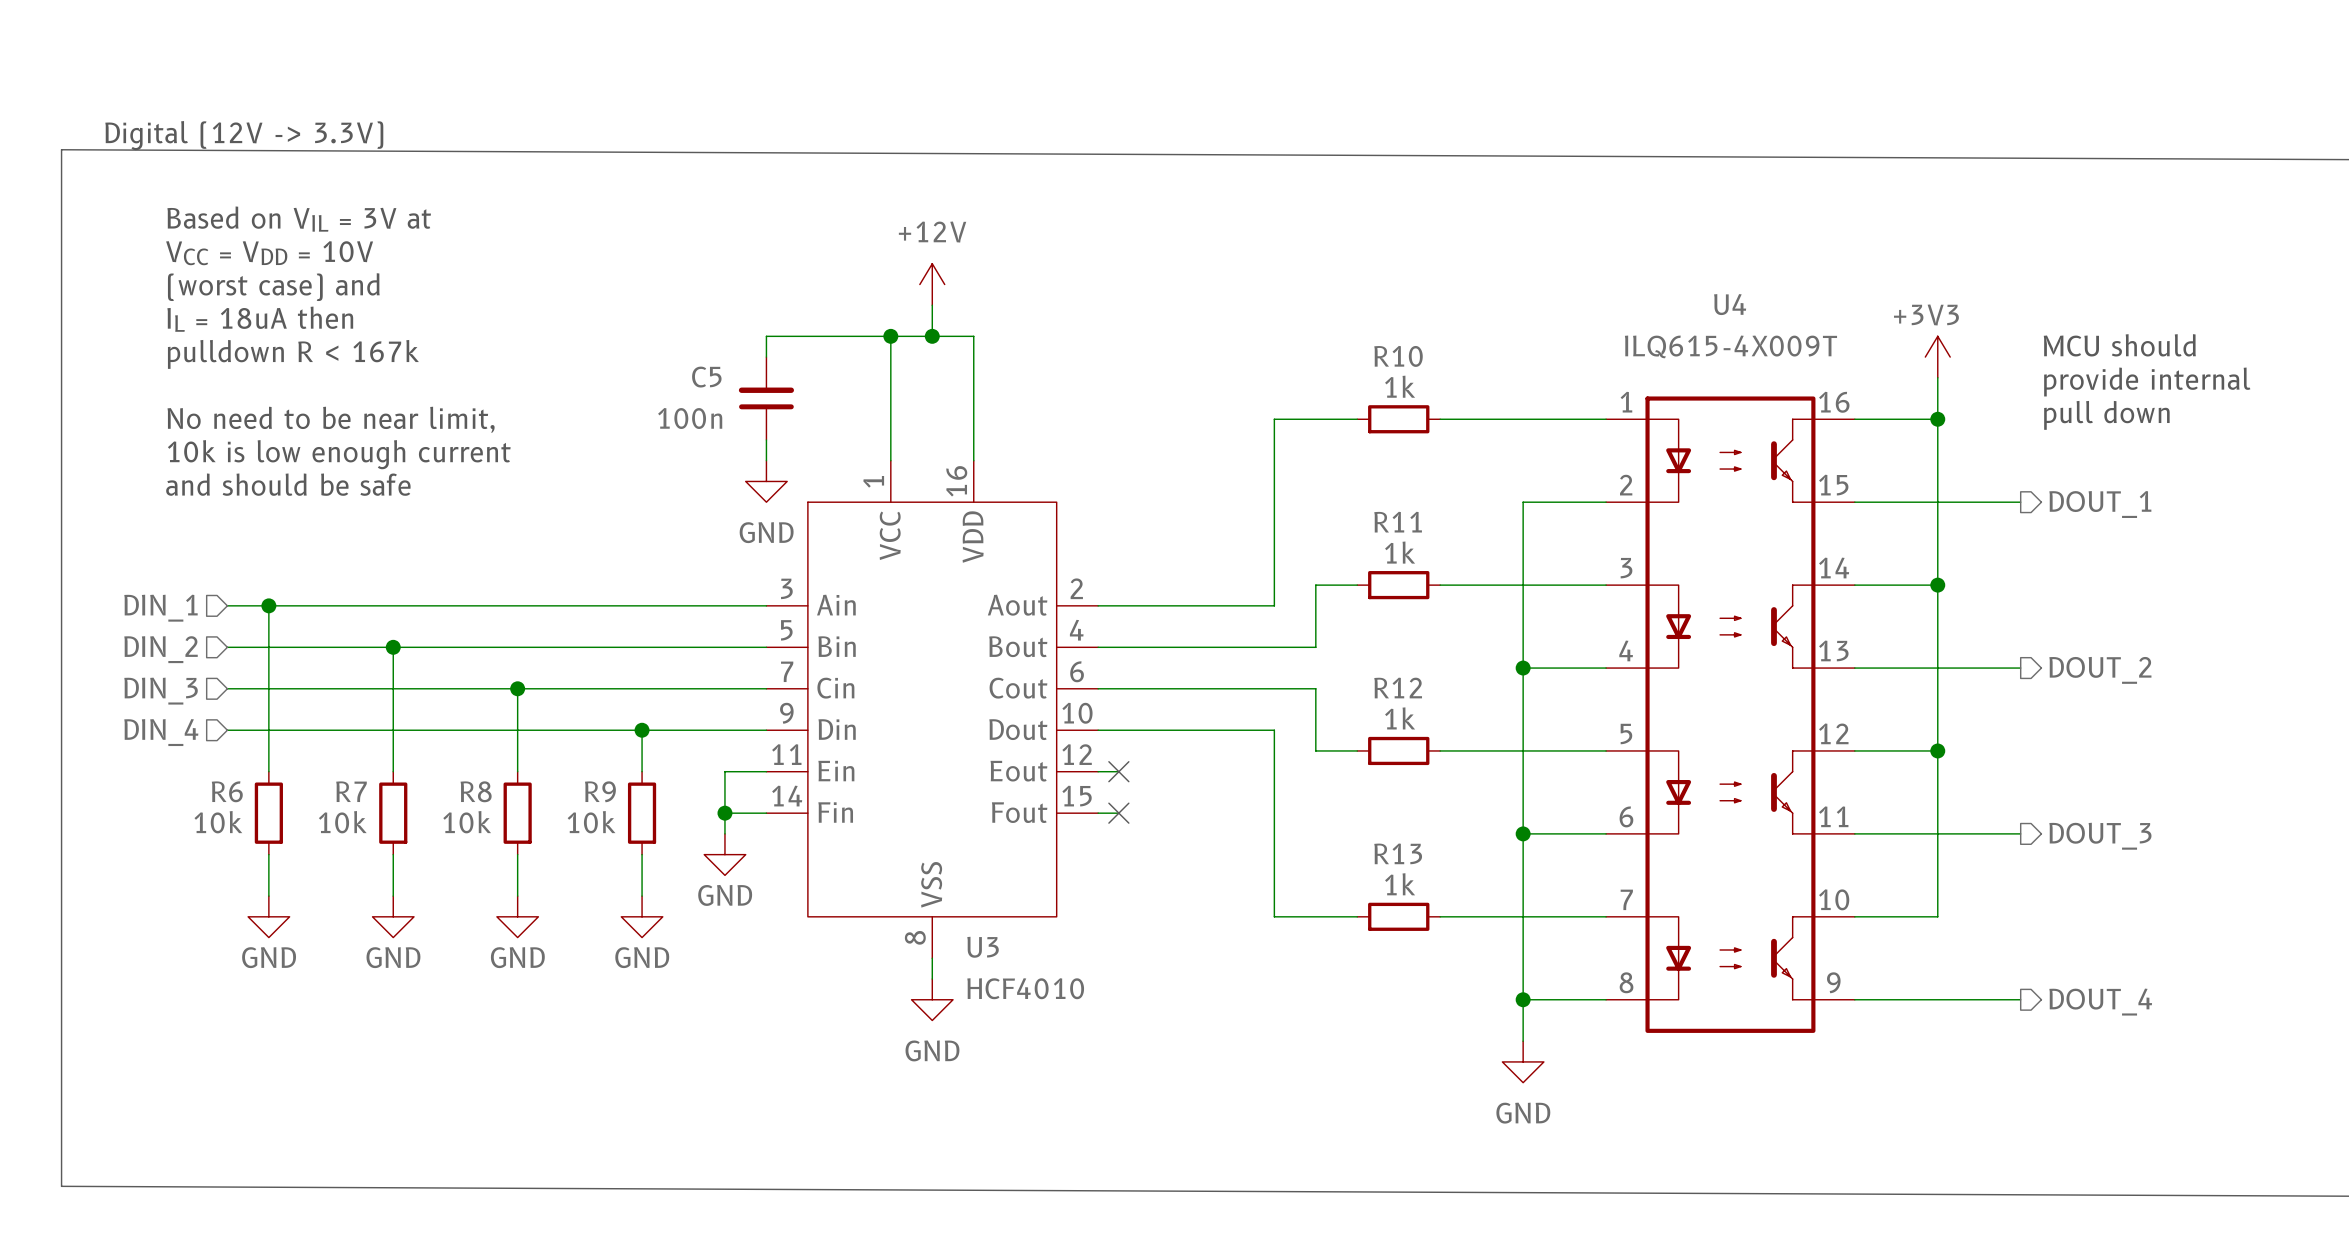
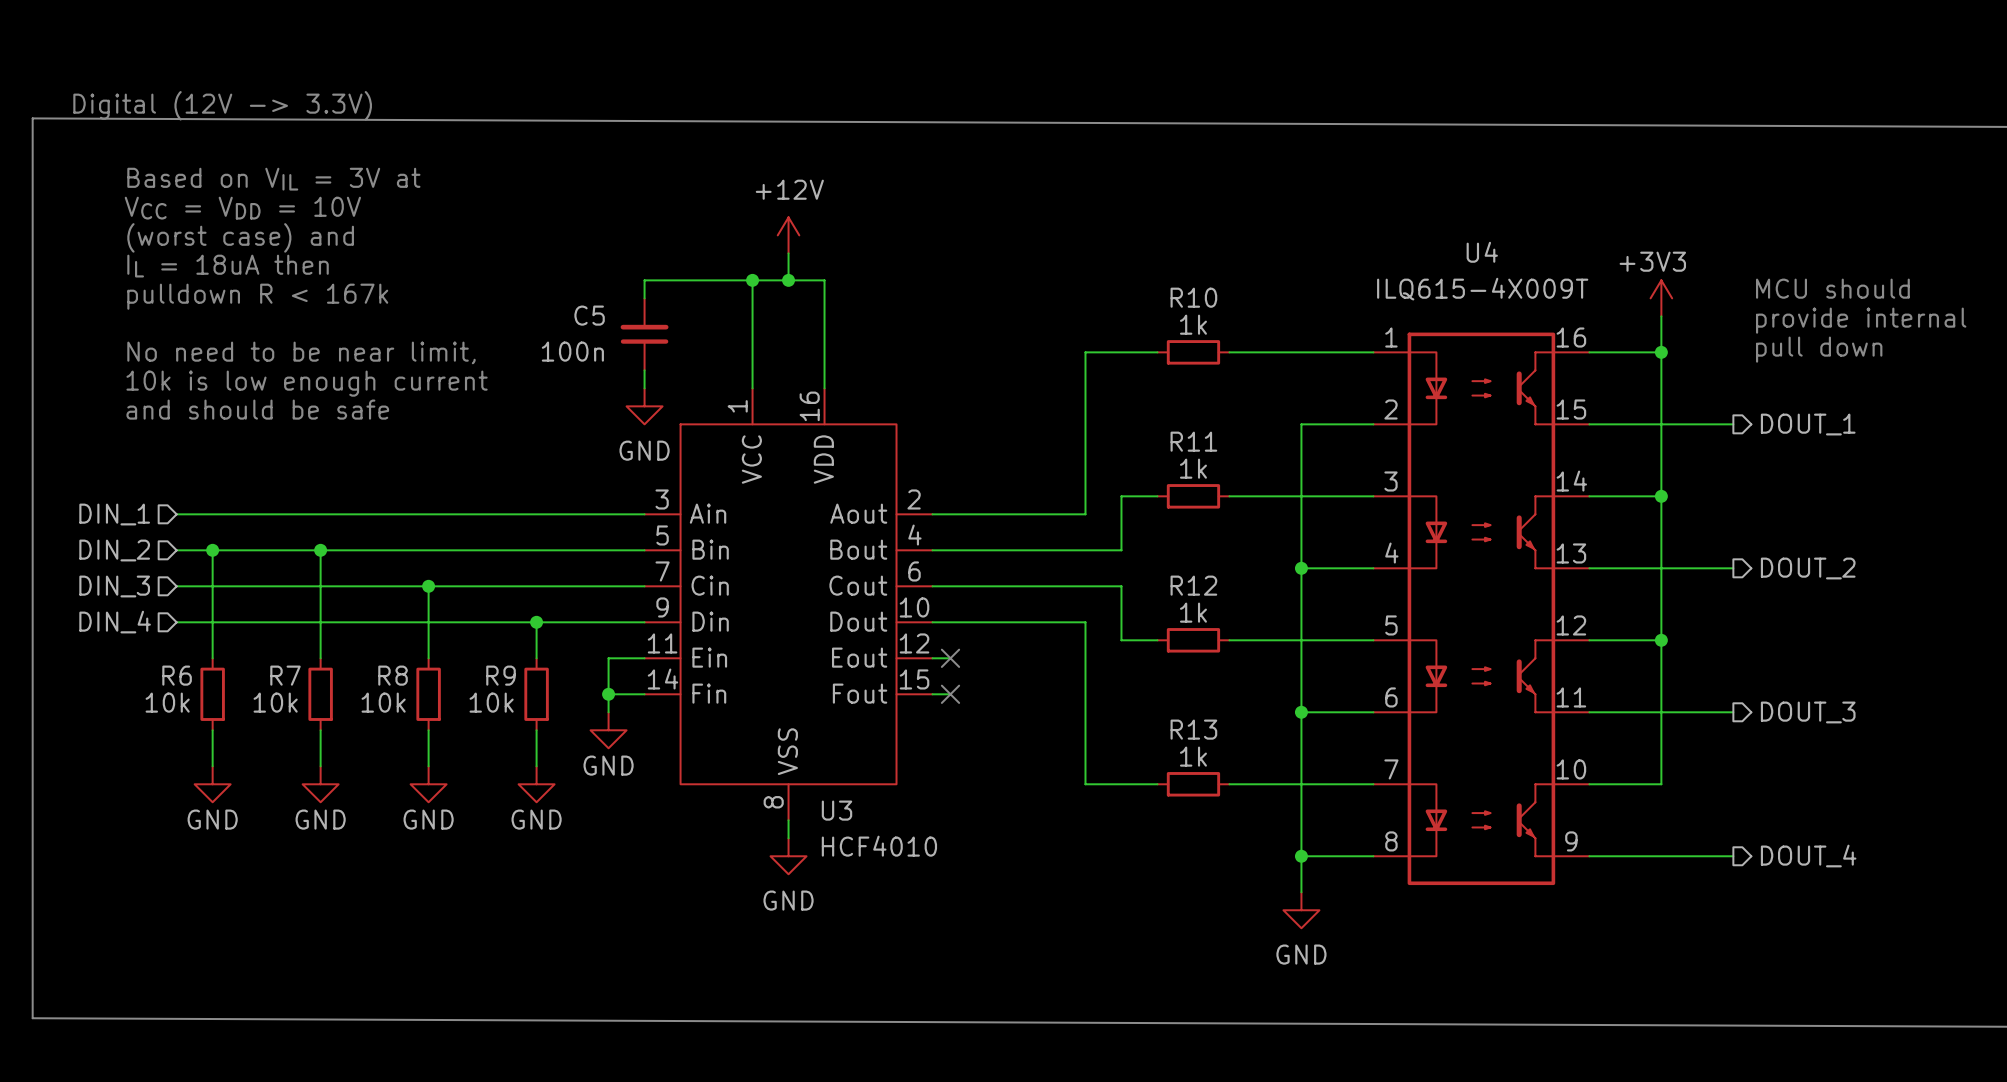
wire: (268, 605) (268, 647) -> none
junction position: (268, 605) -> (212, 550)

